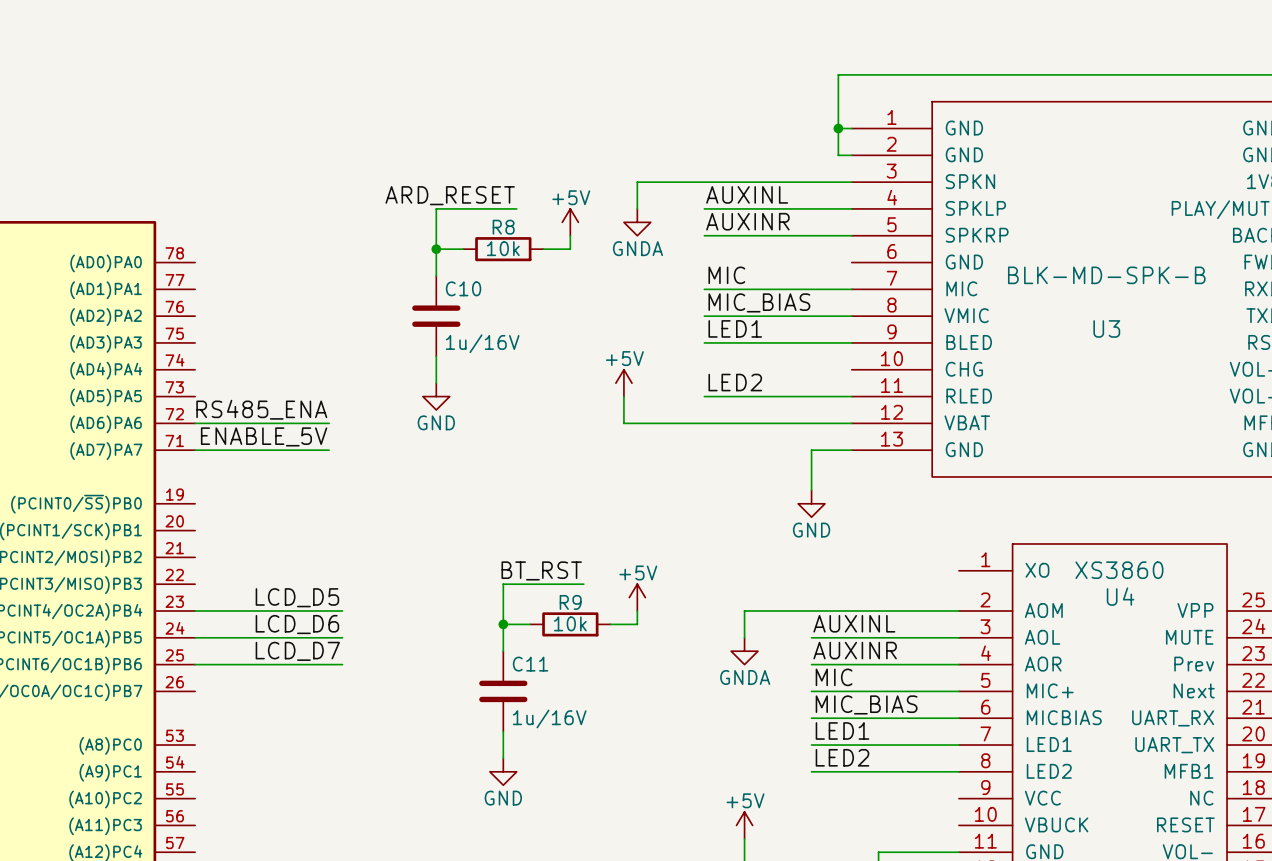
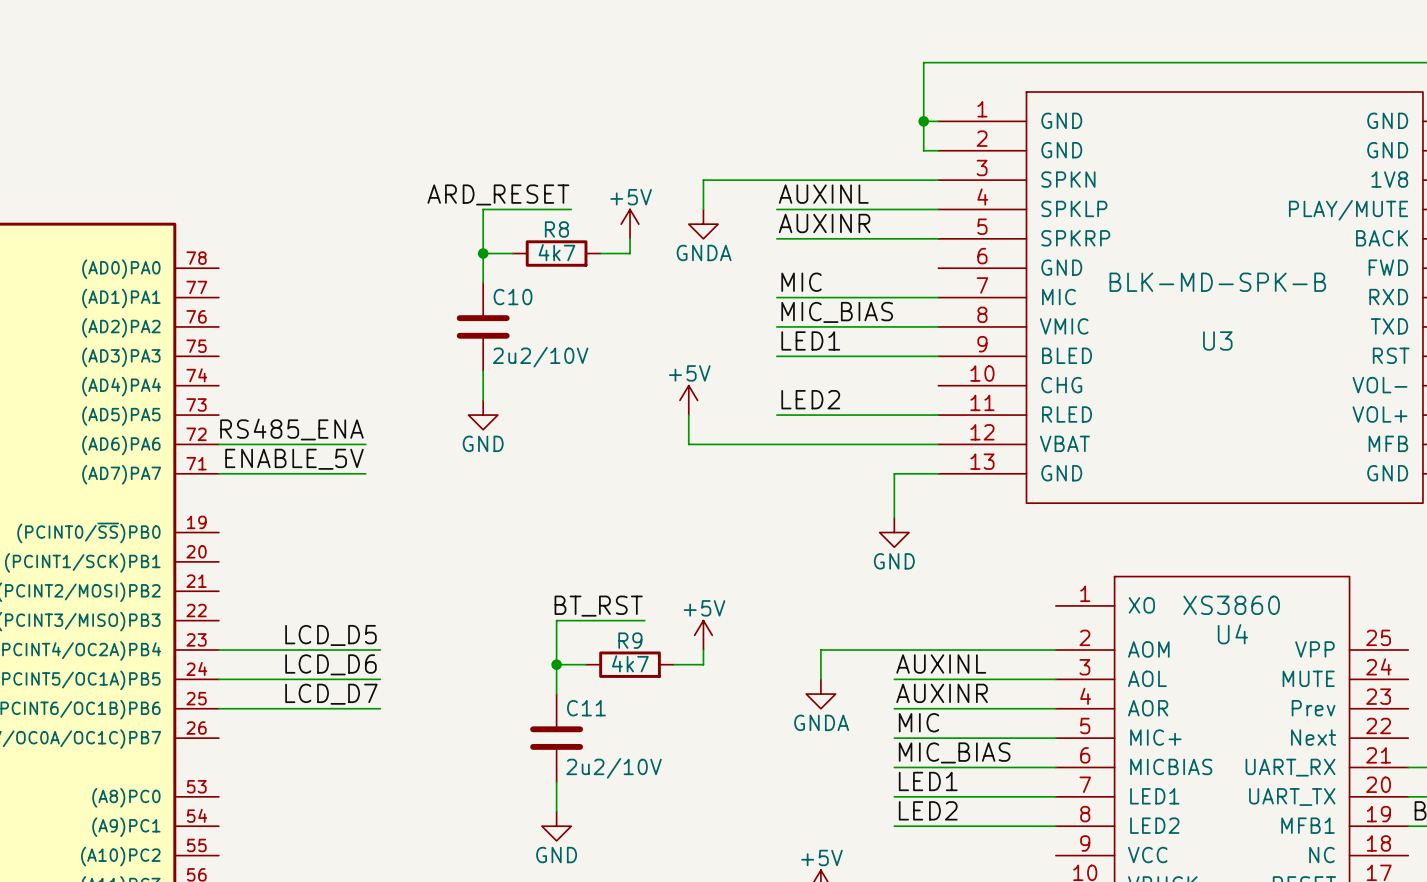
R8 value: 10k (503, 248) -> 4k7 (556, 252)
C10 value: 1u/16V (482, 343) -> 2u2/10V (540, 357)
R9 value: 10k (570, 623) -> 4k7 (630, 663)
C11 value: 1u/16V (549, 718) -> 2u2/10V (614, 768)

